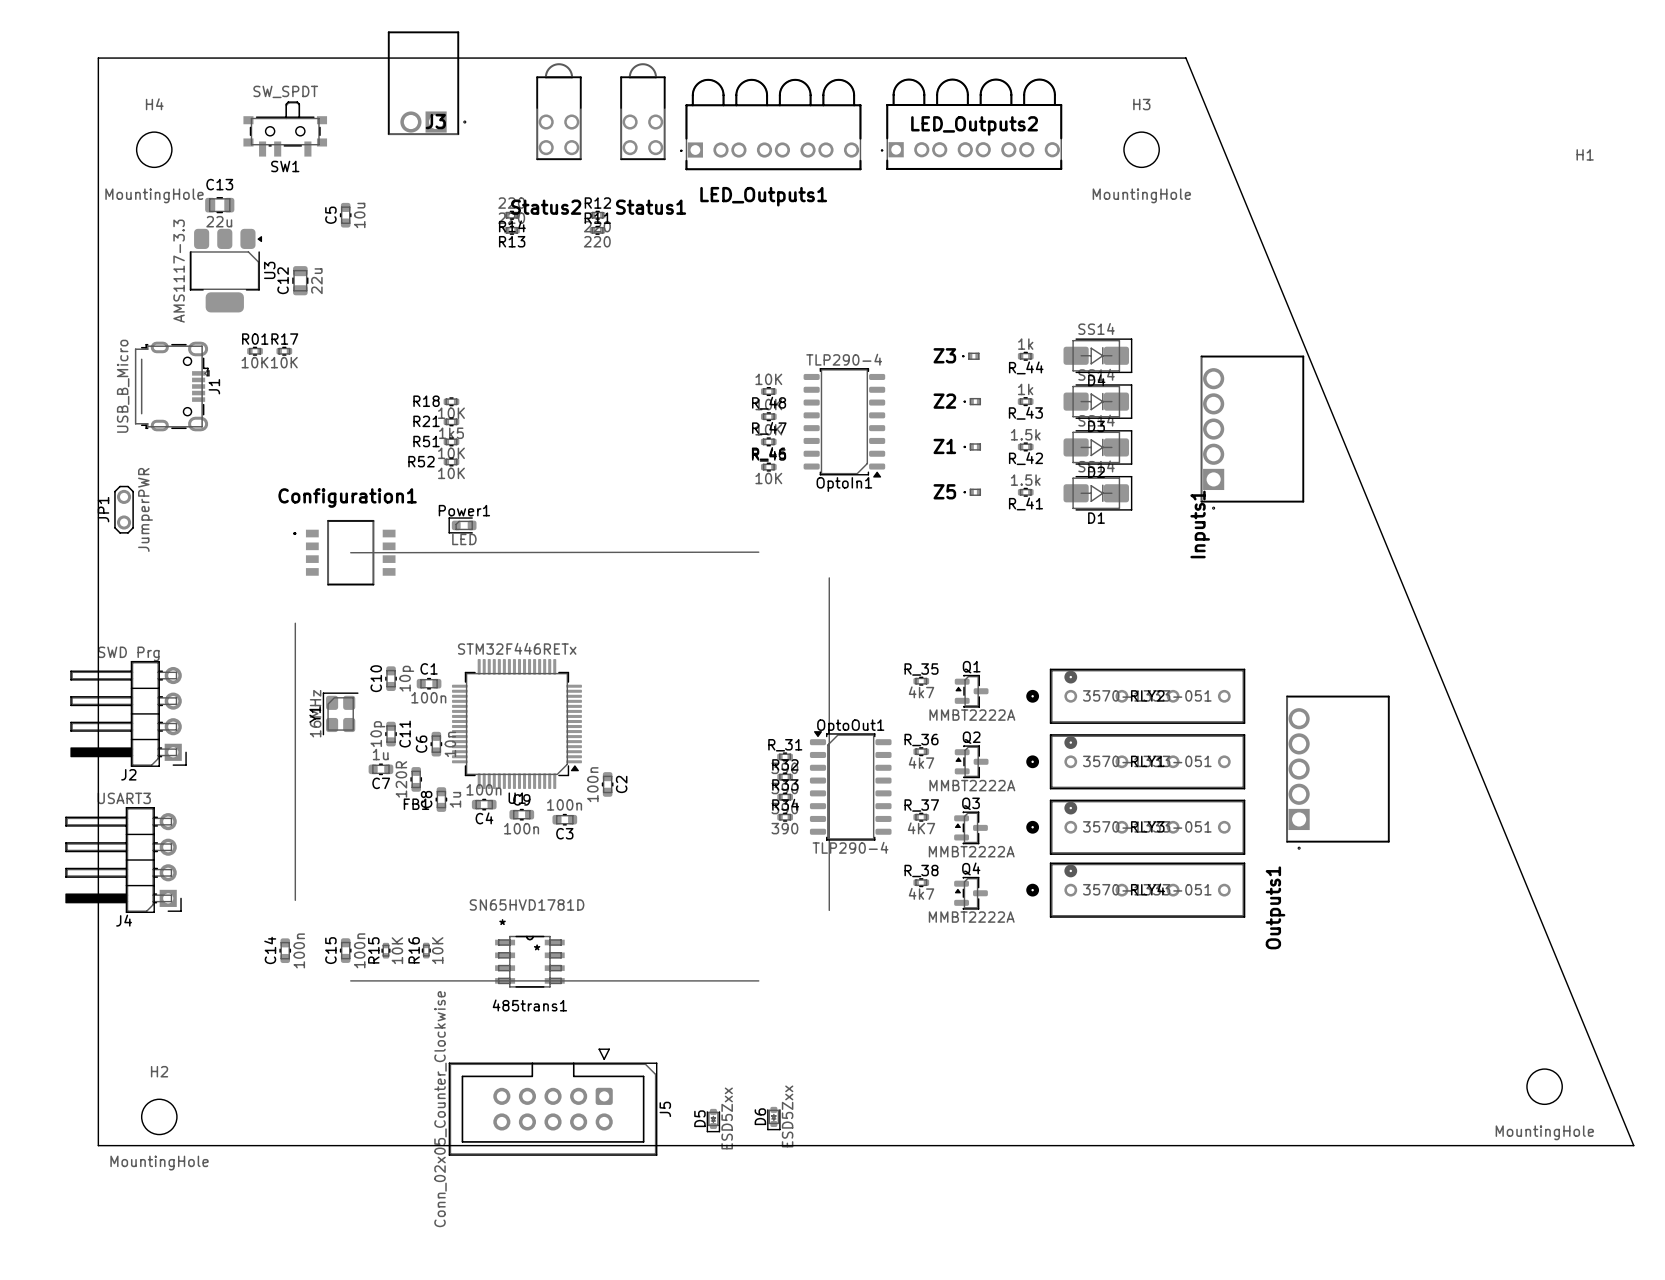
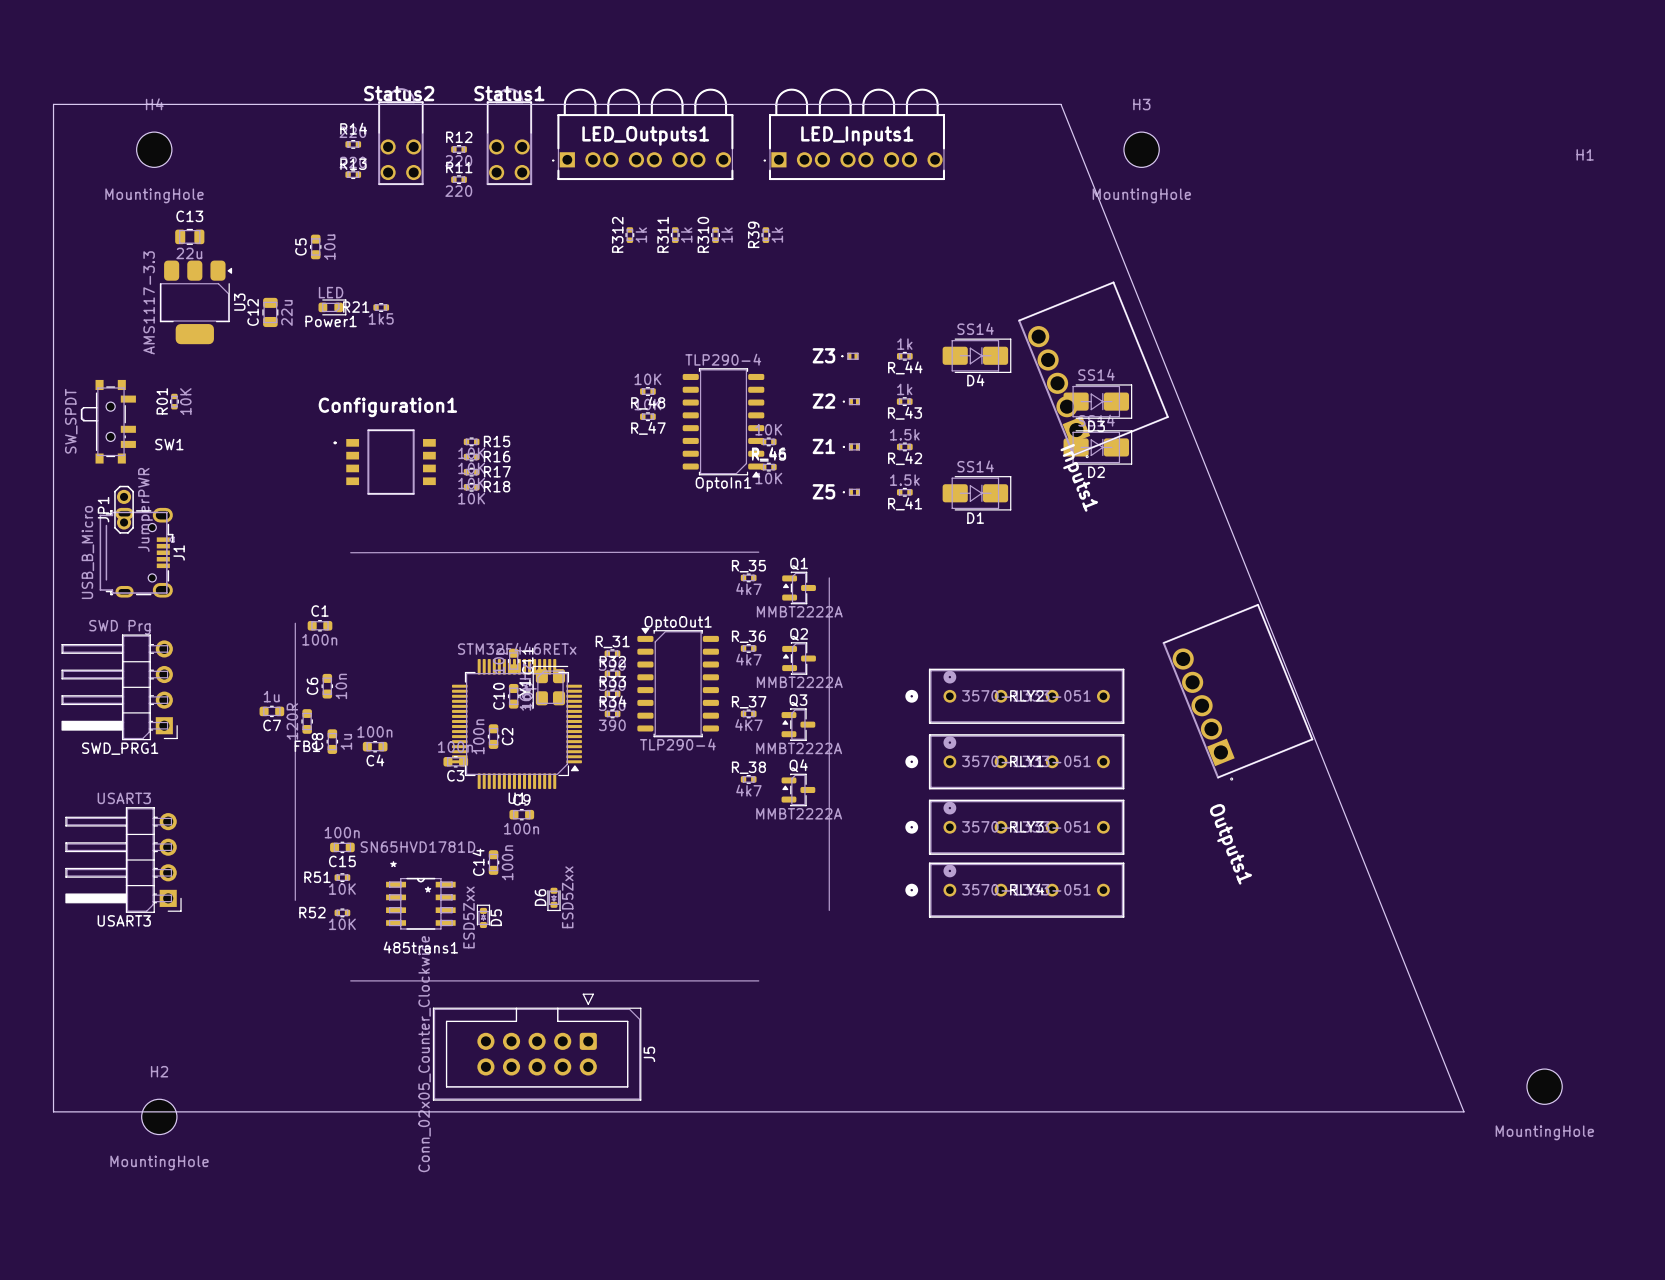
board edge: (98, 58) (1185, 58) (1633, 1145) (98, 1145) (98, 58) -> (53, 104) (53, 1111) (1463, 1111) (1061, 104) (53, 104)
J3: (427, 83) -> none
Status2 position: (558, 111) -> (400, 136)
Status1 position: (642, 111) -> (509, 136)
LED_Outputs1 position: (770, 124) -> (642, 134)
LED_Outputs2: (971, 124) -> none
SW1 rotation: 0° (285, 129) -> 90° counterclockwise (108, 421)
SW1 position: (285, 129) -> (108, 421)
LED_Inputs1: none -> (854, 134)
SW1 name position: SW1 (285, 166) -> SW1 (169, 444)
LED_Outputs1 name position: LED_Outputs1 (763, 196) -> LED_Outputs1 (645, 136)
C13 position: (219, 205) -> (189, 236)
Status2 name position: Status2 (546, 207) -> Status2 (399, 93)
Status1 name position: Status1 (651, 207) -> Status1 (509, 93)
C5 position: (345, 215) -> (315, 246)
R14 position: (511, 215) -> (353, 144)
R12 position: (597, 215) -> (459, 149)
R14 name position: R14 (512, 226) -> R14 (353, 128)
R13 position: (511, 230) -> (353, 174)
R11 position: (597, 230) -> (459, 179)
R312: none -> 1k (629, 235)
R311: none -> 1k (675, 235)
R310: none -> 1k (715, 235)
R39: none -> 1k (765, 235)
R13 name position: R13 (512, 241) -> R13 (353, 164)
U3 position: (225, 270) -> (195, 302)
C12 position: (300, 280) -> (270, 312)
R17 name position: R17 (284, 339) -> R17 (497, 471)
R01 rotation: 0° (255, 351) -> 90° clockwise (174, 401)
R01 position: (255, 351) -> (174, 401)
R17 position: (284, 351) -> (471, 472)
D4 position: (1097, 355) -> (976, 355)
Z3 position: (970, 356) -> (849, 356)
R_44 position: (1025, 356) -> (904, 356)
J1 position: (172, 386) -> (137, 552)
R_48 position: (768, 391) -> (647, 391)
R18 name position: R18 (426, 401) -> R18 (497, 486)
R18 position: (451, 401) -> (471, 487)
Z2 position: (972, 401) -> (851, 401)
R_43 position: (1025, 401) -> (904, 401)
R_47 position: (768, 416) -> (647, 416)
R21 position: (451, 421) -> (381, 307)
OptoIn1 position: (844, 422) -> (723, 422)
Inputs1 rotation: 0° (1252, 432) -> 22° counterclockwise (1093, 369)
Inputs1 position: (1252, 432) -> (1093, 369)
R51 position: (451, 441) -> (342, 877)
Z1 position: (972, 446) -> (851, 446)
R_42 position: (1025, 446) -> (904, 446)
R52 position: (451, 461) -> (342, 912)
Z5 position: (972, 492) -> (851, 492)
R_41 position: (1025, 492) -> (904, 492)
D1 position: (1097, 493) -> (976, 493)
Power1 rotation: 0° (462, 525) -> 180° (332, 307)
Power1 position: (462, 525) -> (332, 307)
Configuration1 position: (344, 552) -> (384, 462)
C10 position: (391, 678) -> (513, 696)
R_35 position: (921, 681) -> (748, 577)
C1 position: (429, 683) -> (320, 625)
SWD_PRG1: none -> SWD Prg (119, 687)
Q1 position: (971, 691) -> (799, 587)
RLY2 position: (1135, 696) -> (1014, 696)
J2: SWD Prg (128, 713) -> none
Y1 position: (340, 713) -> (550, 687)
C11 position: (391, 734) -> (513, 661)
C6 position: (436, 744) -> (327, 686)
R_36 position: (921, 751) -> (748, 648)
R_31 position: (785, 756) -> (612, 653)
Q2 position: (971, 761) -> (799, 658)
RLY1 position: (1135, 761) -> (1014, 761)
C7 position: (380, 769) -> (271, 711)
Outputs1 rotation: 0° (1337, 772) -> 22° counterclockwise (1238, 692)
Outputs1 position: (1337, 772) -> (1238, 692)
R32 position: (785, 777) -> (612, 673)
FB1 position: (416, 779) -> (307, 721)
C2 position: (607, 784) -> (493, 736)
OptoOut1 position: (850, 785) -> (678, 682)
R33 position: (785, 797) -> (612, 693)
C8 position: (441, 799) -> (332, 741)
C4 position: (484, 804) -> (375, 746)
R34 position: (785, 817) -> (612, 713)
R_37 position: (921, 817) -> (748, 713)
C3 position: (564, 819) -> (455, 761)
Q3 position: (971, 827) -> (798, 724)
RLY3 position: (1135, 827) -> (1014, 827)
R_38 position: (921, 882) -> (748, 779)
RLY4 position: (1135, 890) -> (1014, 890)
Q4 position: (971, 893) -> (798, 789)
J4 name: J4 (124, 920) -> USART3 (124, 920)
C14 position: (285, 950) -> (493, 862)
C15 name position: C15 (330, 950) -> C15 (342, 861)
C15 rotation: 0° (345, 950) -> 90° clockwise (342, 847)
C15 position: (345, 950) -> (342, 847)
C15 value position: 100n (359, 950) -> 100n (342, 832)
R15 name position: R15 (373, 950) -> R15 (497, 441)
R15 rotation: 0° (385, 950) -> 90° clockwise (471, 441)
R15 position: (385, 950) -> (471, 441)
R16 name position: R16 (414, 950) -> R16 (497, 456)
R16 rotation: 0° (426, 950) -> 90° clockwise (471, 457)
R16 position: (426, 950) -> (471, 457)
485trans1 position: (529, 961) -> (420, 903)
J5 position: (553, 1102) -> (537, 1047)
D6 position: (773, 1118) -> (553, 899)
D5 rotation: 0° (713, 1120) -> 180° (483, 916)
D5 position: (713, 1120) -> (483, 916)

